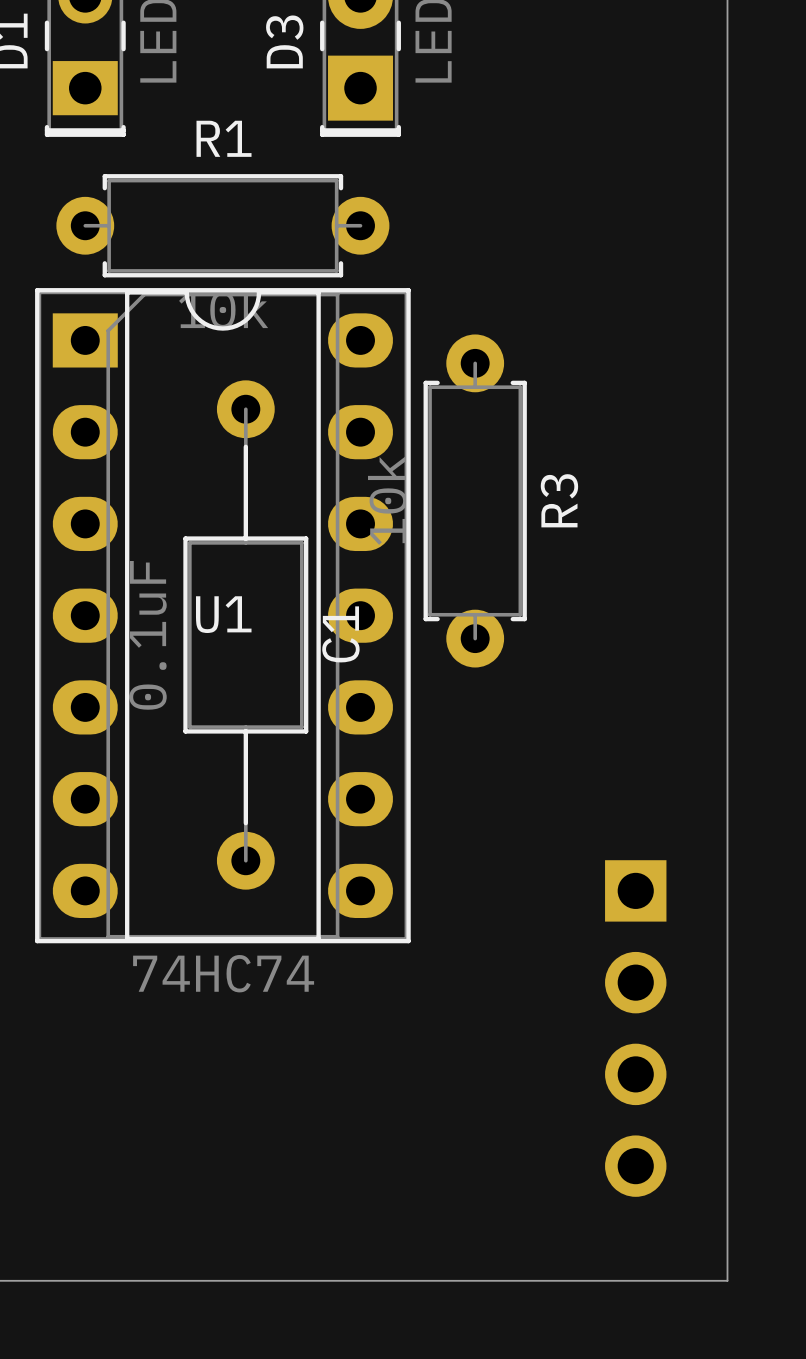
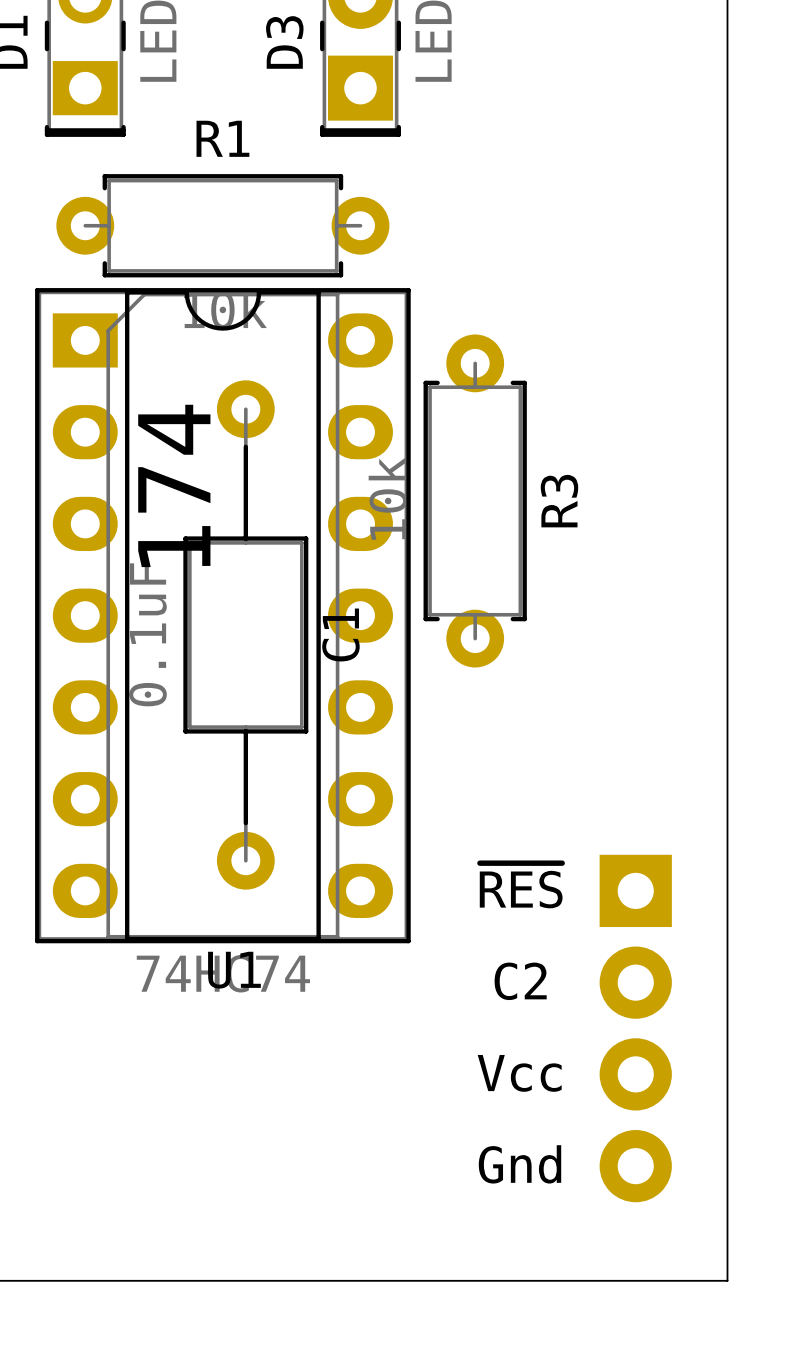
text: none -> 174 (174, 485)
U1 name position: U1 (223, 614) -> U1 (234, 970)
part footprint: [605, 860, 667, 1197] -> [599, 854, 672, 1203]
text: none -> ~{RES} (521, 885)
text: none -> C2 (520, 981)
text: none -> Vcc (519, 1073)
text: none -> Gnd (519, 1164)

